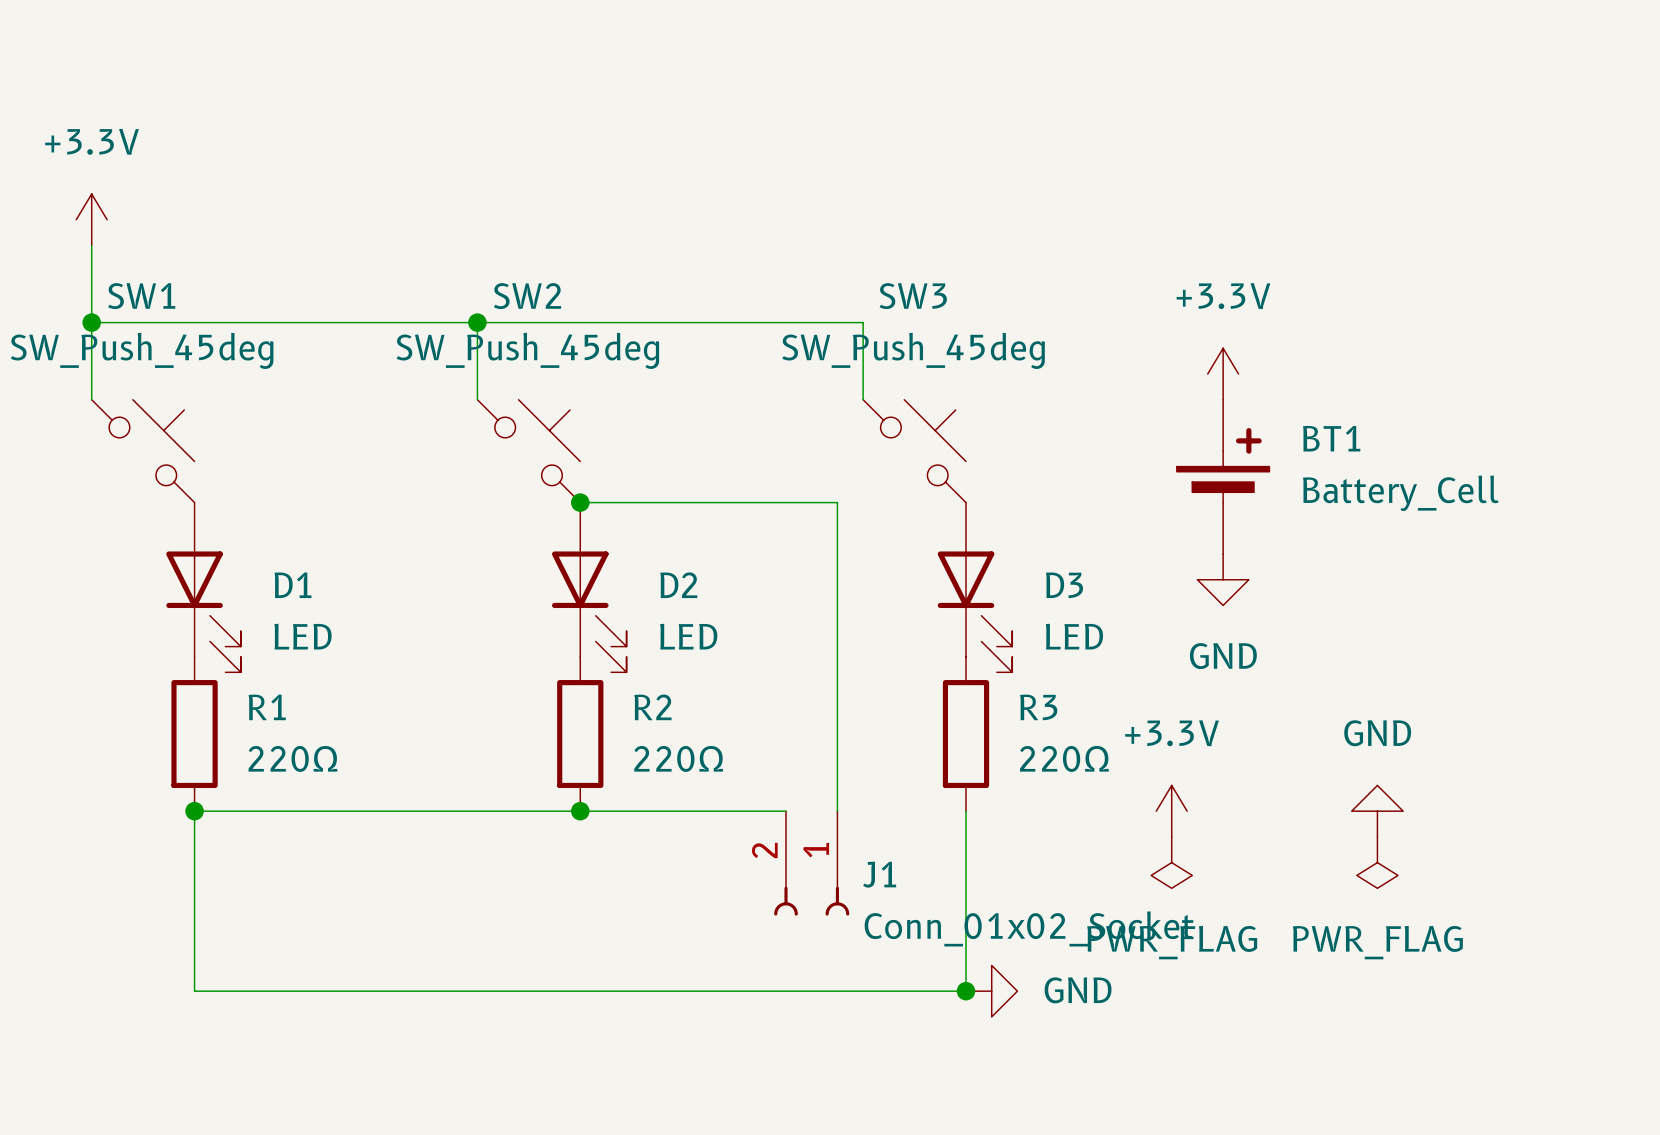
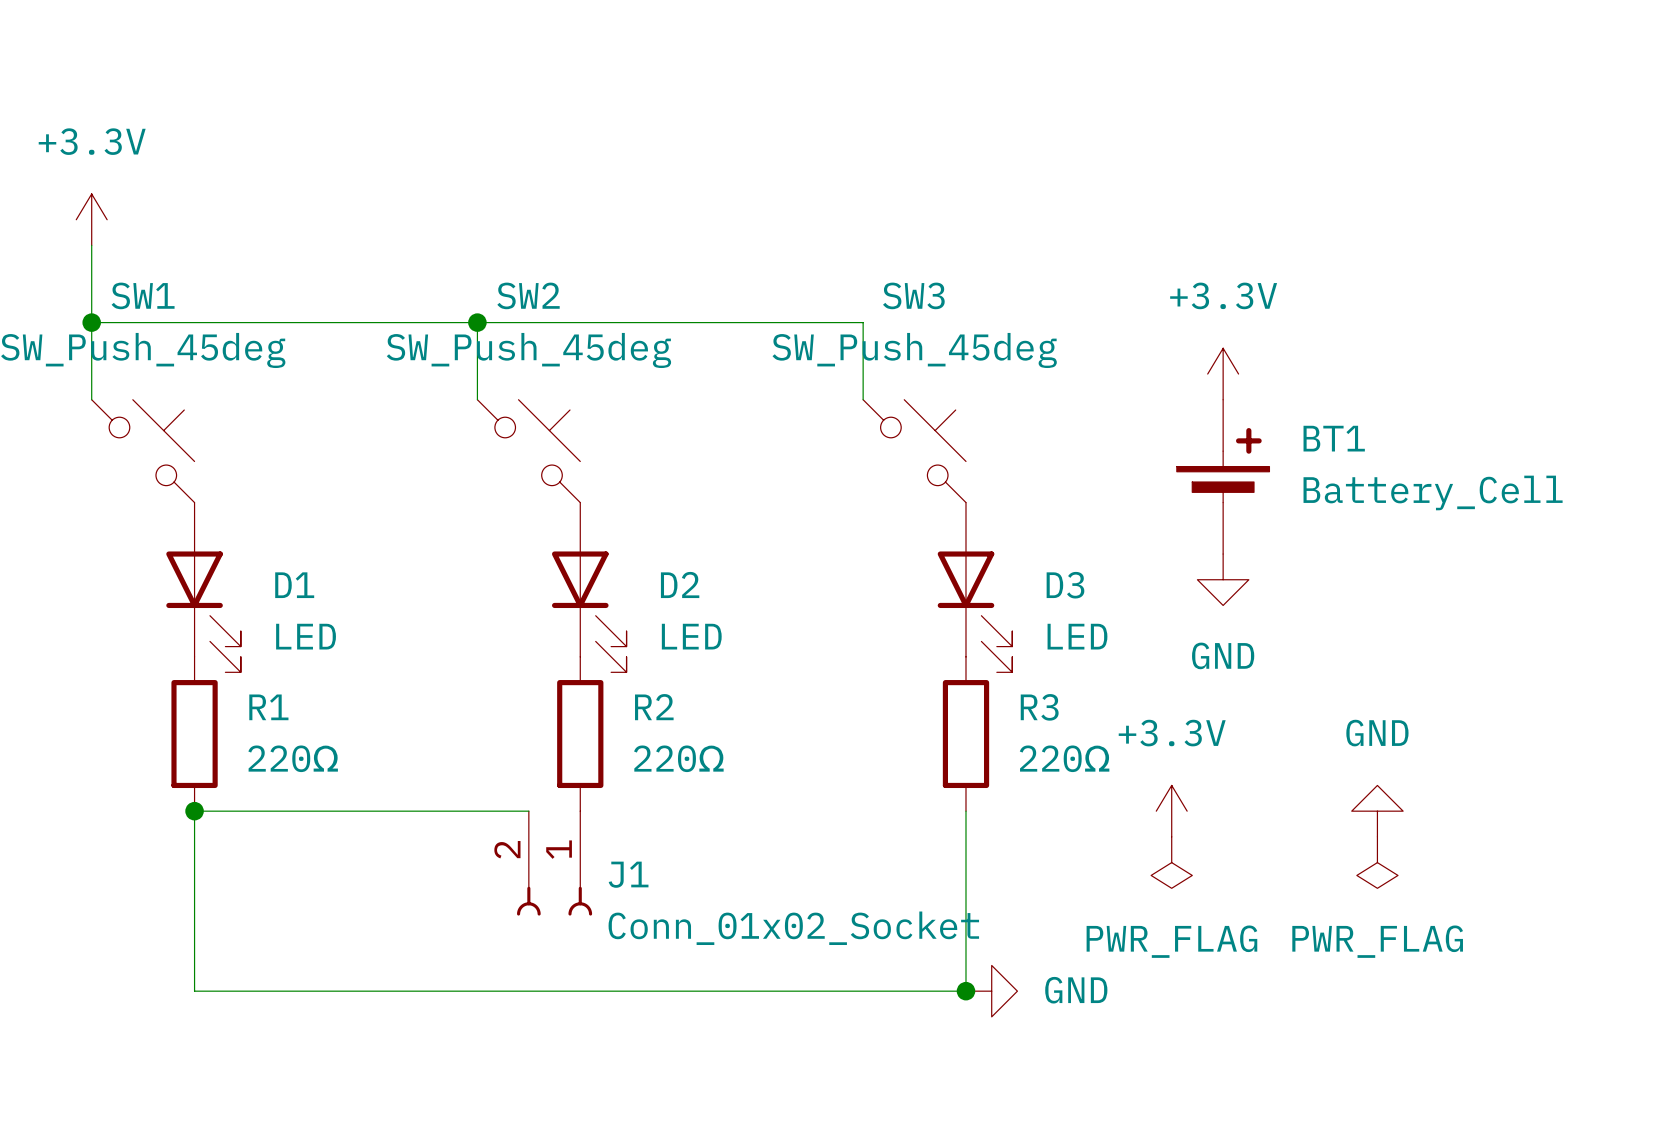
wire: (580, 502) (837, 502) (837, 811) -> none
junction: (580, 502) -> none
wire: (528, 811) (785, 811) -> none
junction: (580, 811) -> none
J1 position: (811, 863) -> (554, 863)

